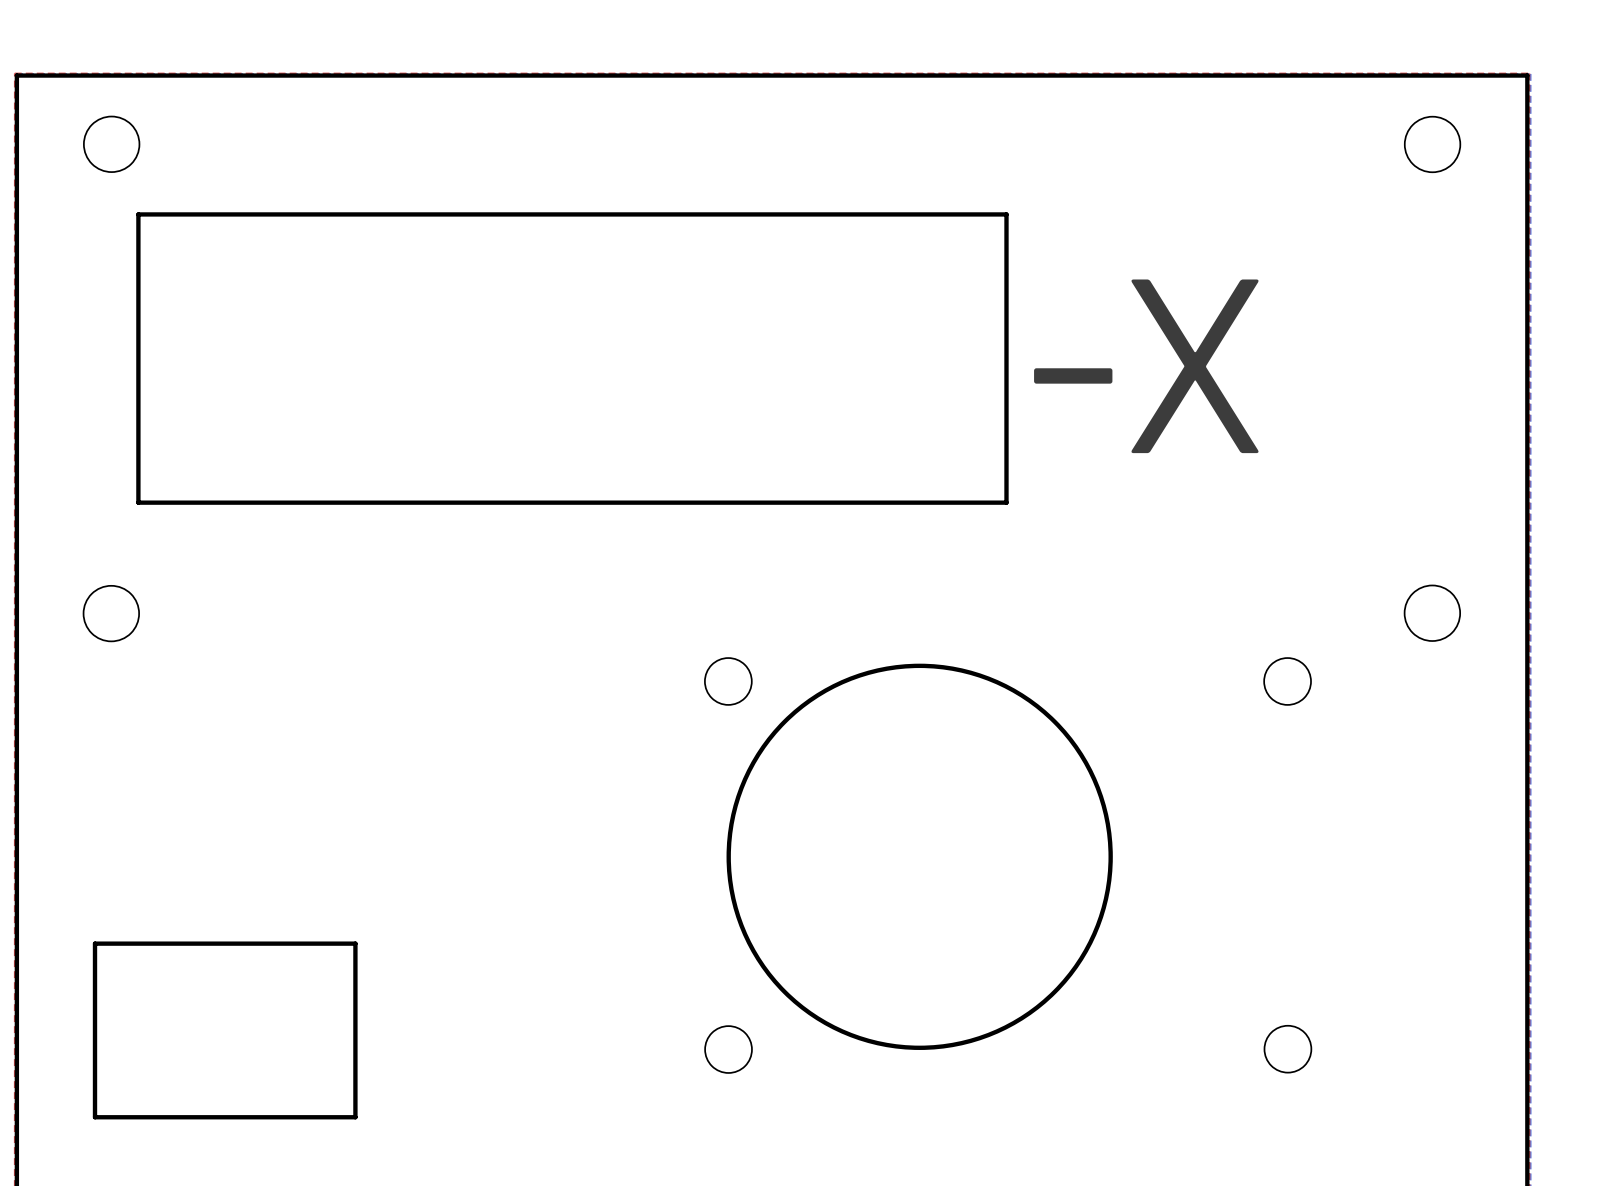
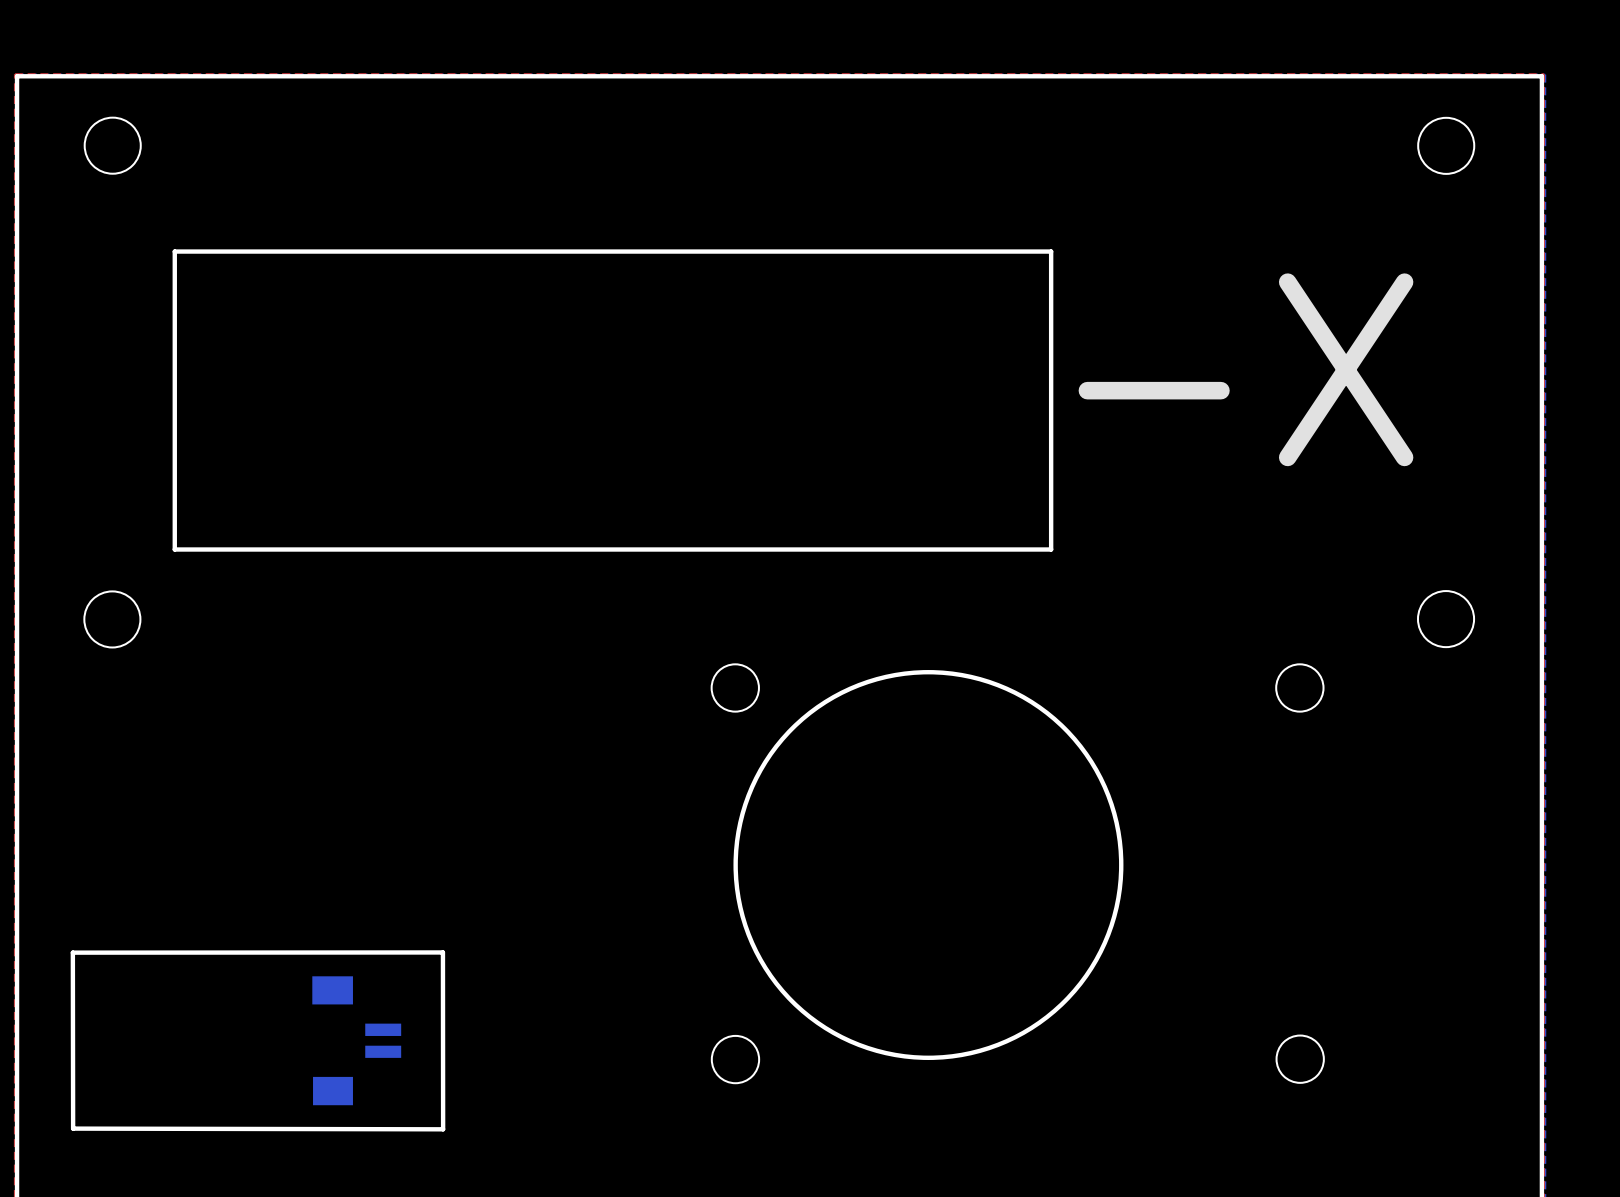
board edge: (138, 214) (138, 502) (1006, 502) (1006, 214) (138, 214) -> (174, 251) (174, 549) (1051, 549) (1051, 251) (174, 251)
board edge: (95, 943) (95, 1117) (355, 1117) (355, 943) (95, 943) -> (442, 952) (72, 952) (73, 1128) (443, 1129) (442, 952)
part: none -> (356, 1040)

